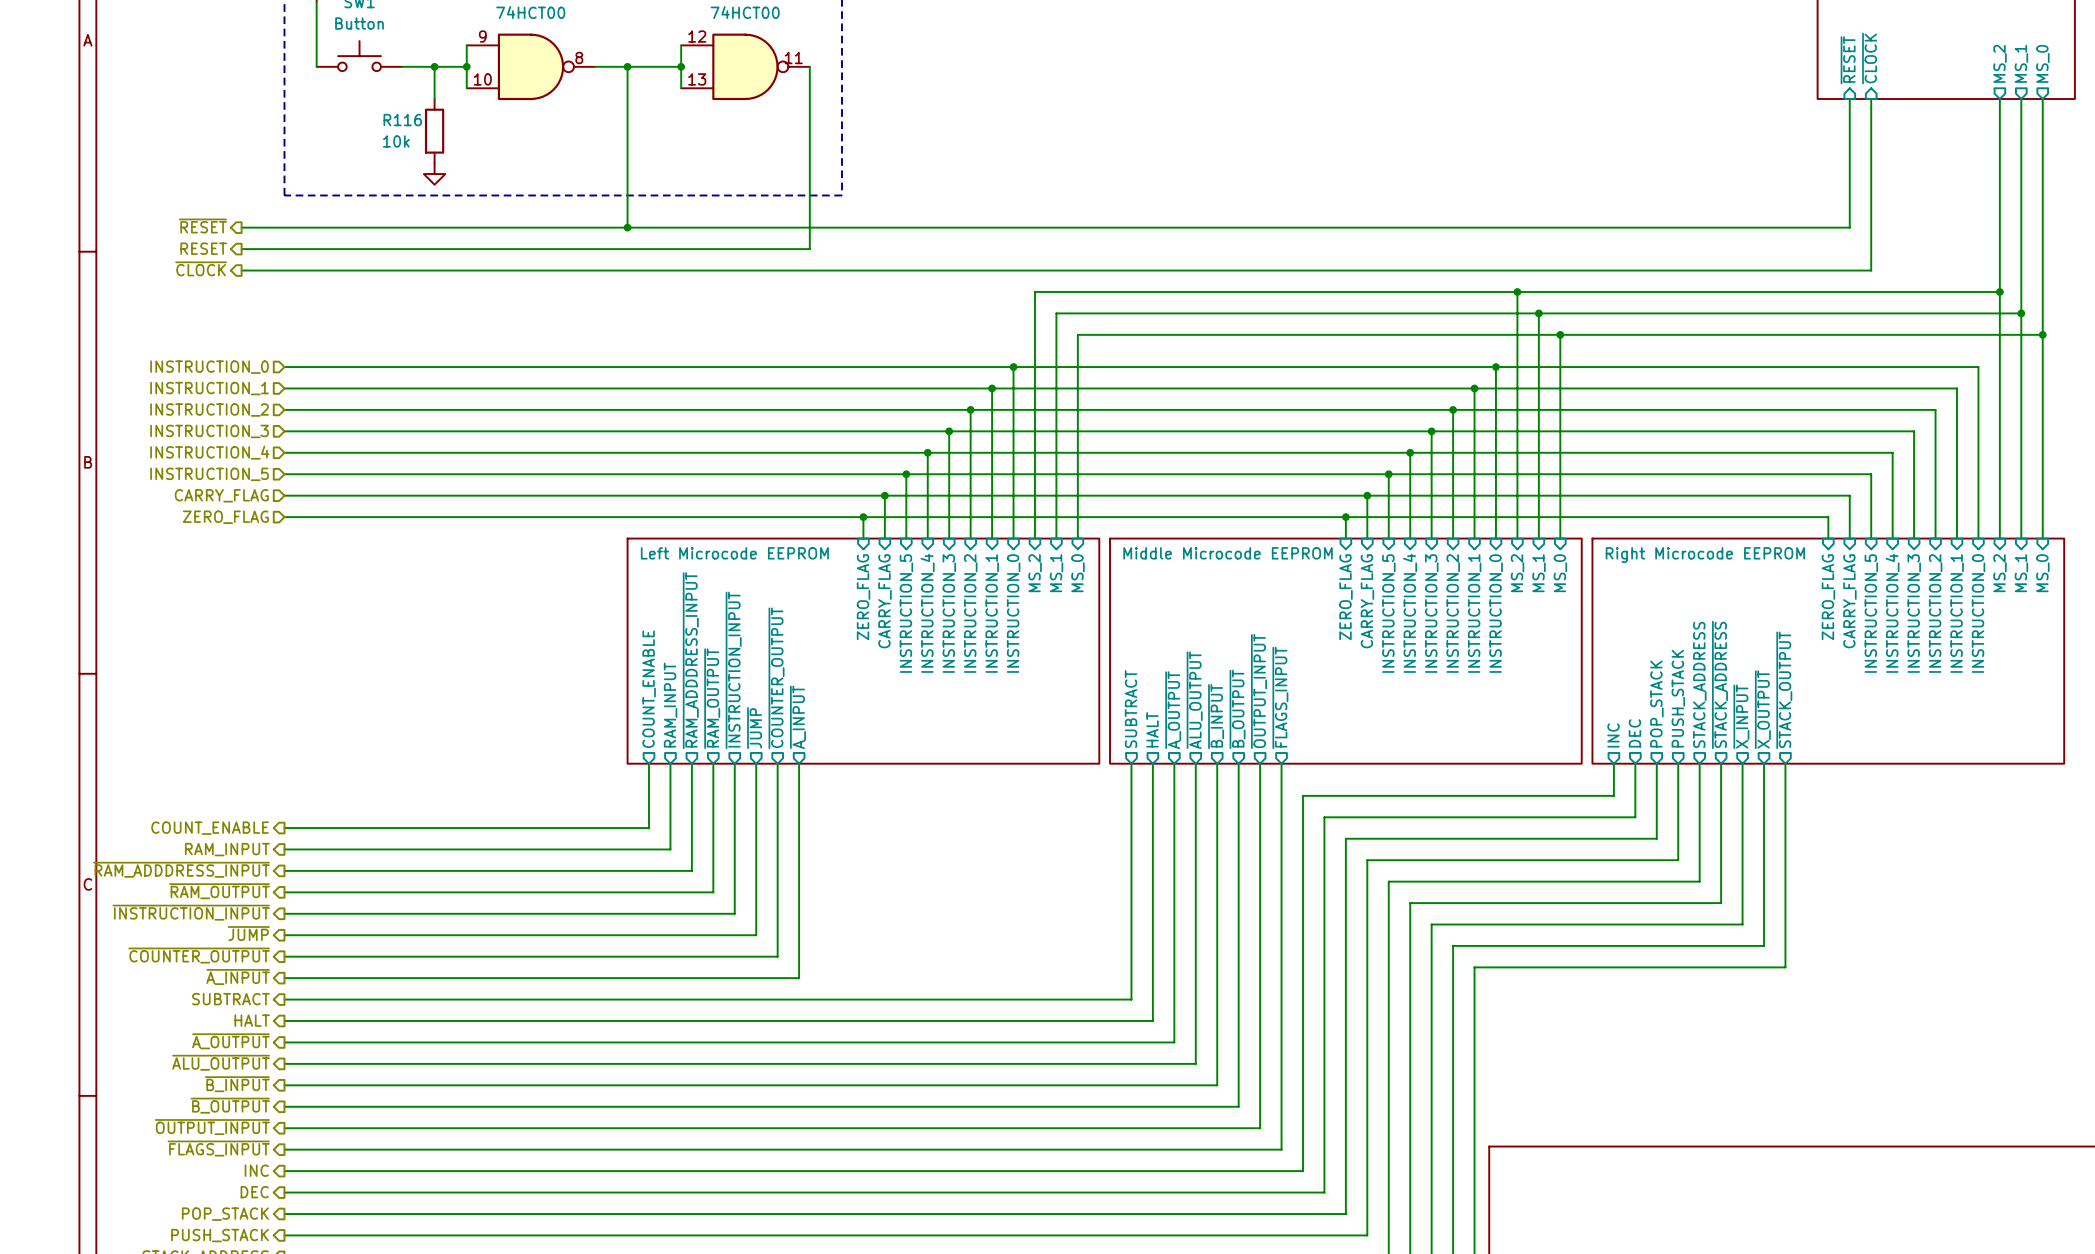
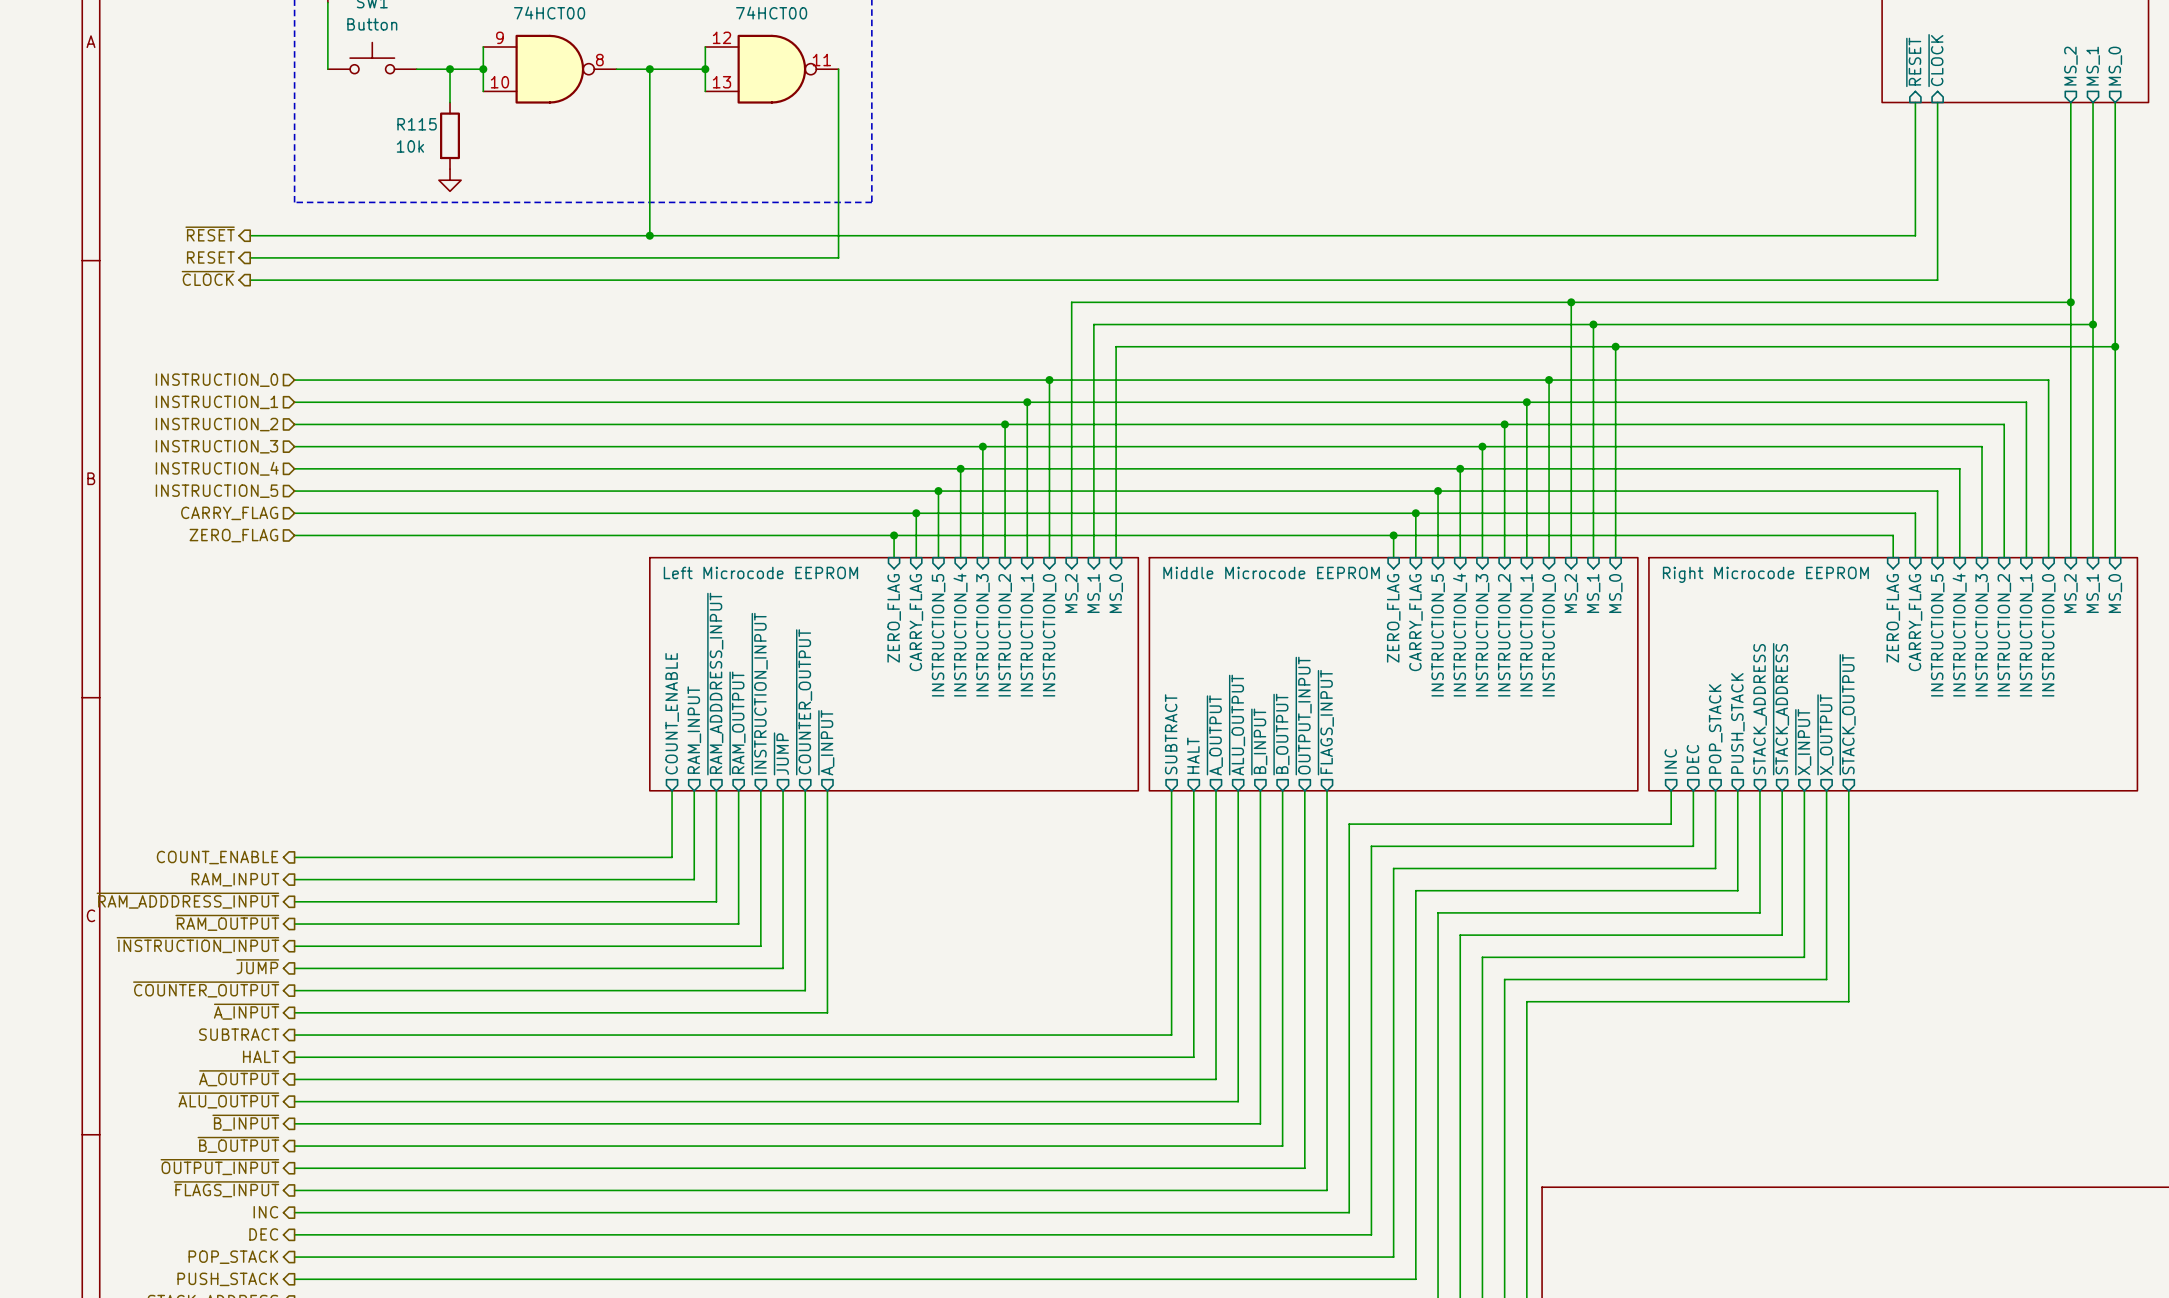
R116 name: R116 (402, 120) -> R115 (417, 124)

